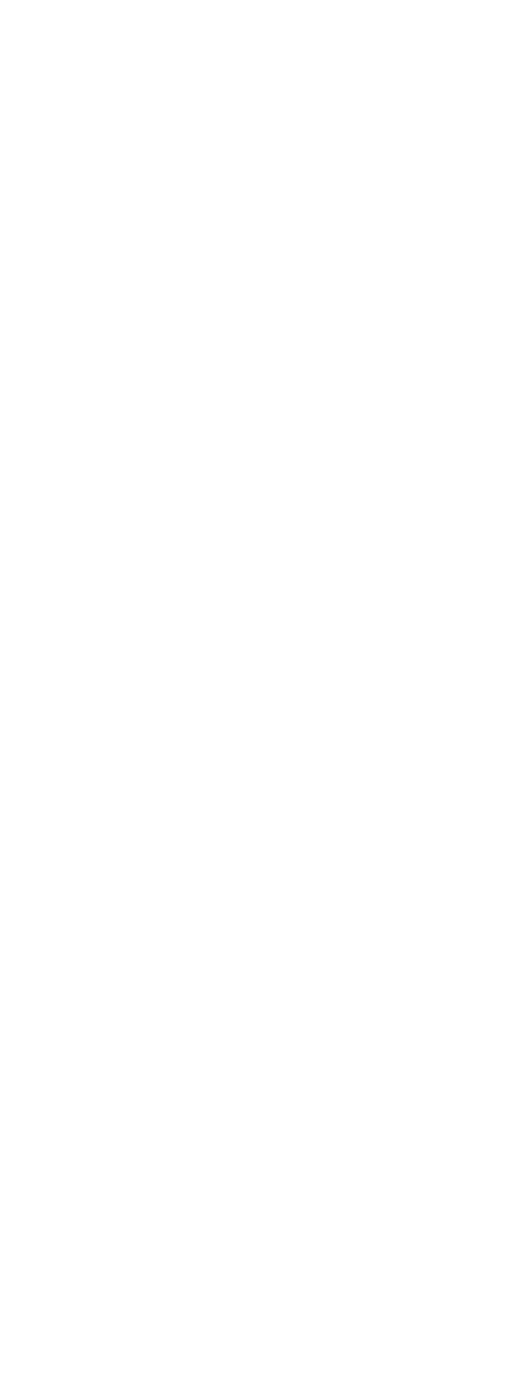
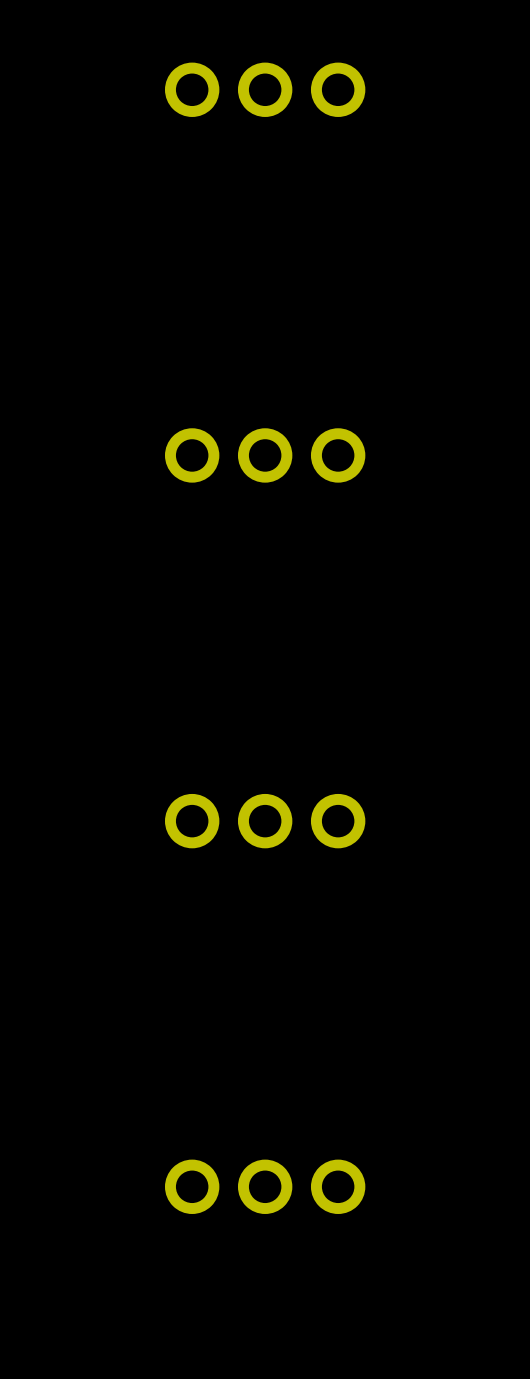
part: none -> (265, 89)
part: none -> (265, 455)
part: none -> (265, 821)
part: none -> (265, 1186)

